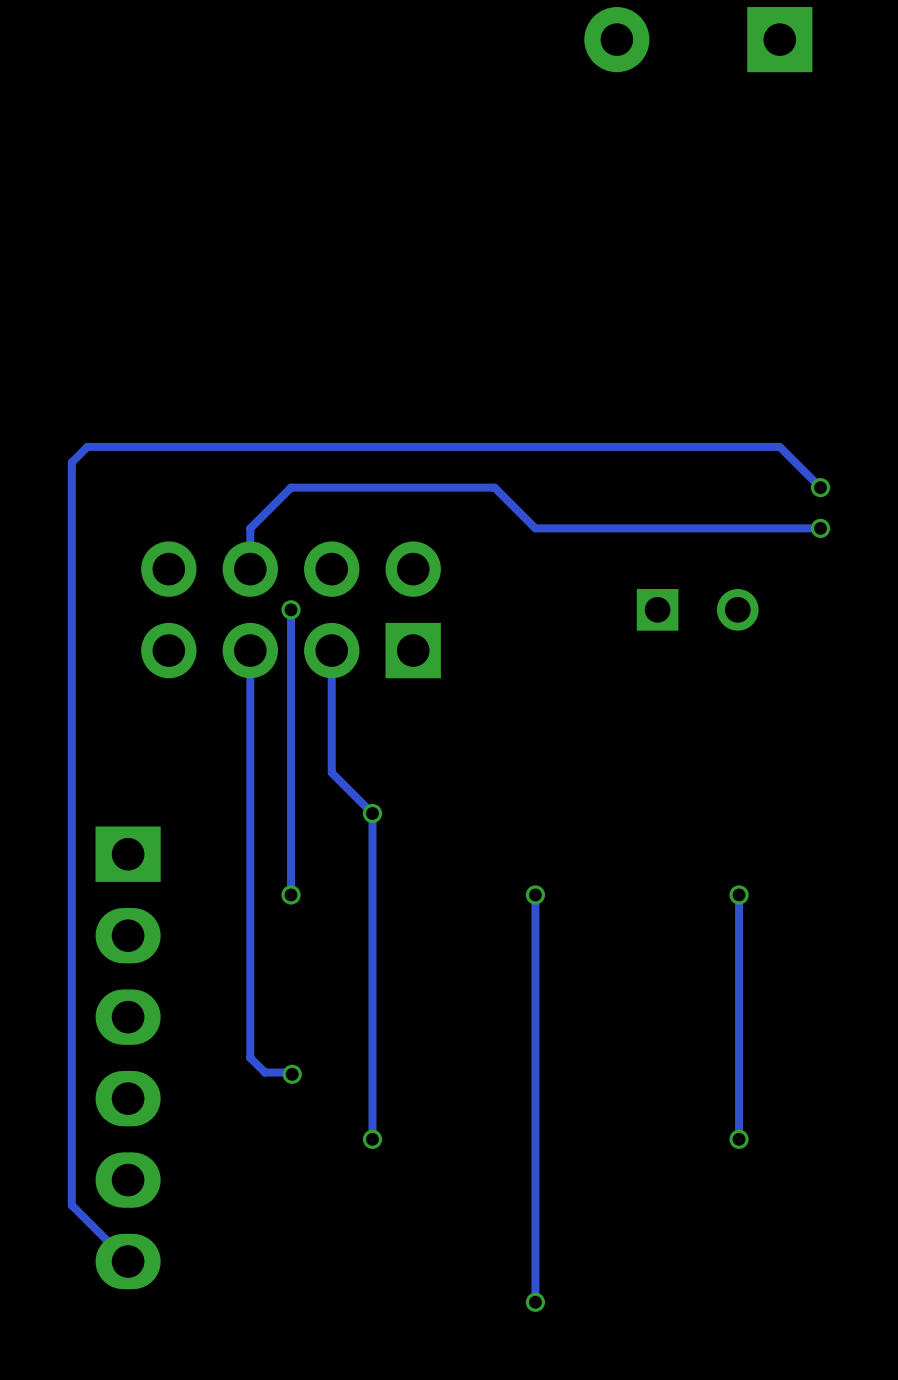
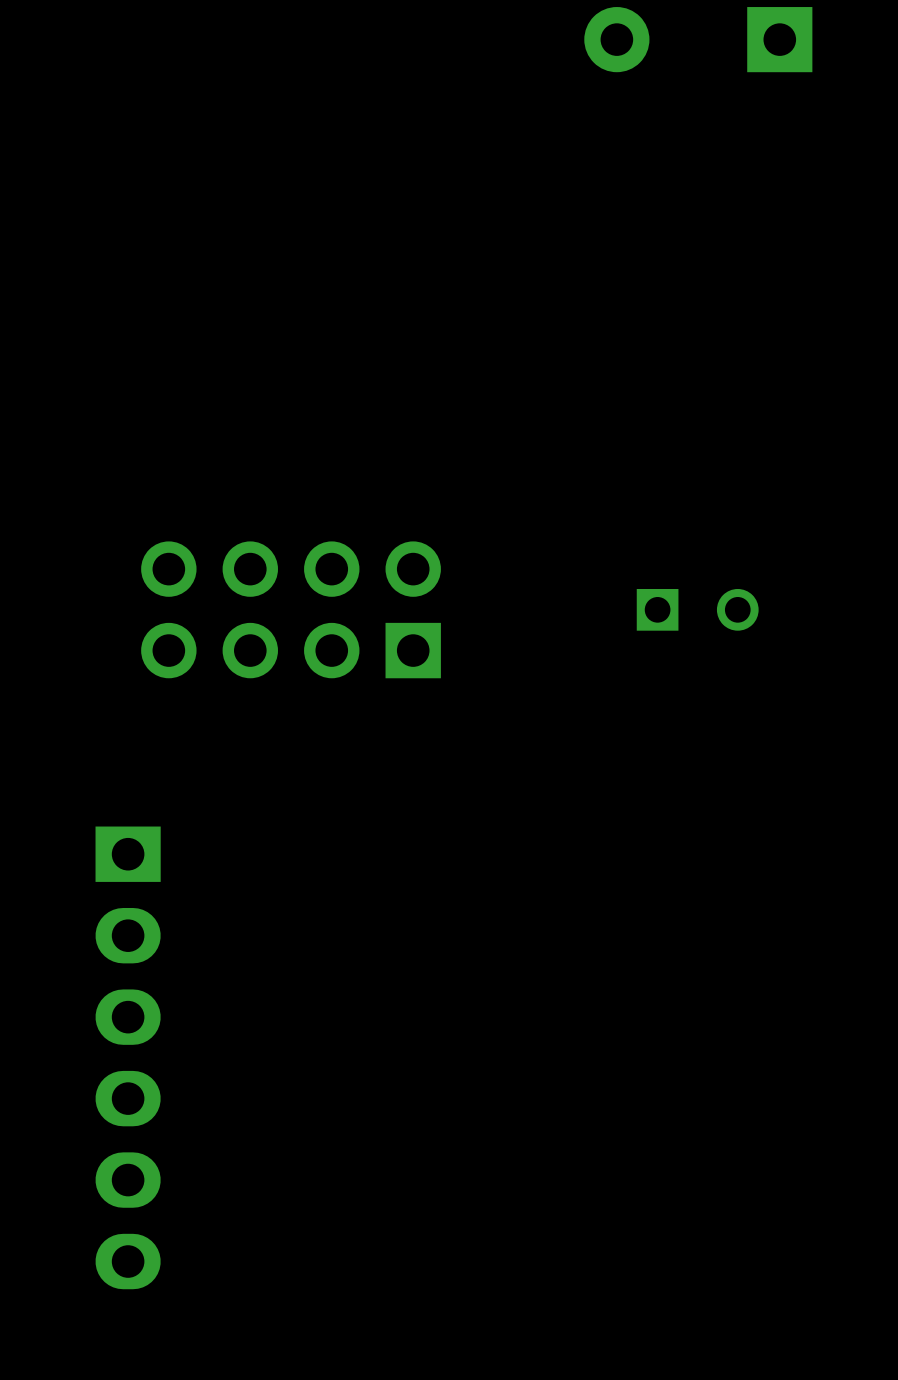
track: (820, 487) (779, 446) (87, 446) (71, 462) (71, 1205) (128, 1261) -> none
via: (820, 487) -> none
track: (820, 528) (535, 528) (494, 487) (291, 487) (250, 528) (250, 569) -> none
via: (820, 528) -> none
track: (291, 609) (291, 894) -> none
via: (291, 609) -> none
track: (250, 650) (250, 1057) (264, 1072) (290, 1072) (292, 1074) -> none
track: (331, 650) (331, 772) (372, 813) (372, 1139) -> none
via: (372, 813) -> none
via: (291, 894) -> none
track: (535, 894) (535, 1302) -> none
via: (535, 894) -> none
track: (739, 894) (739, 1139) -> none
via: (739, 894) -> none
via: (292, 1074) -> none
via: (372, 1139) -> none
via: (739, 1139) -> none
via: (535, 1302) -> none

